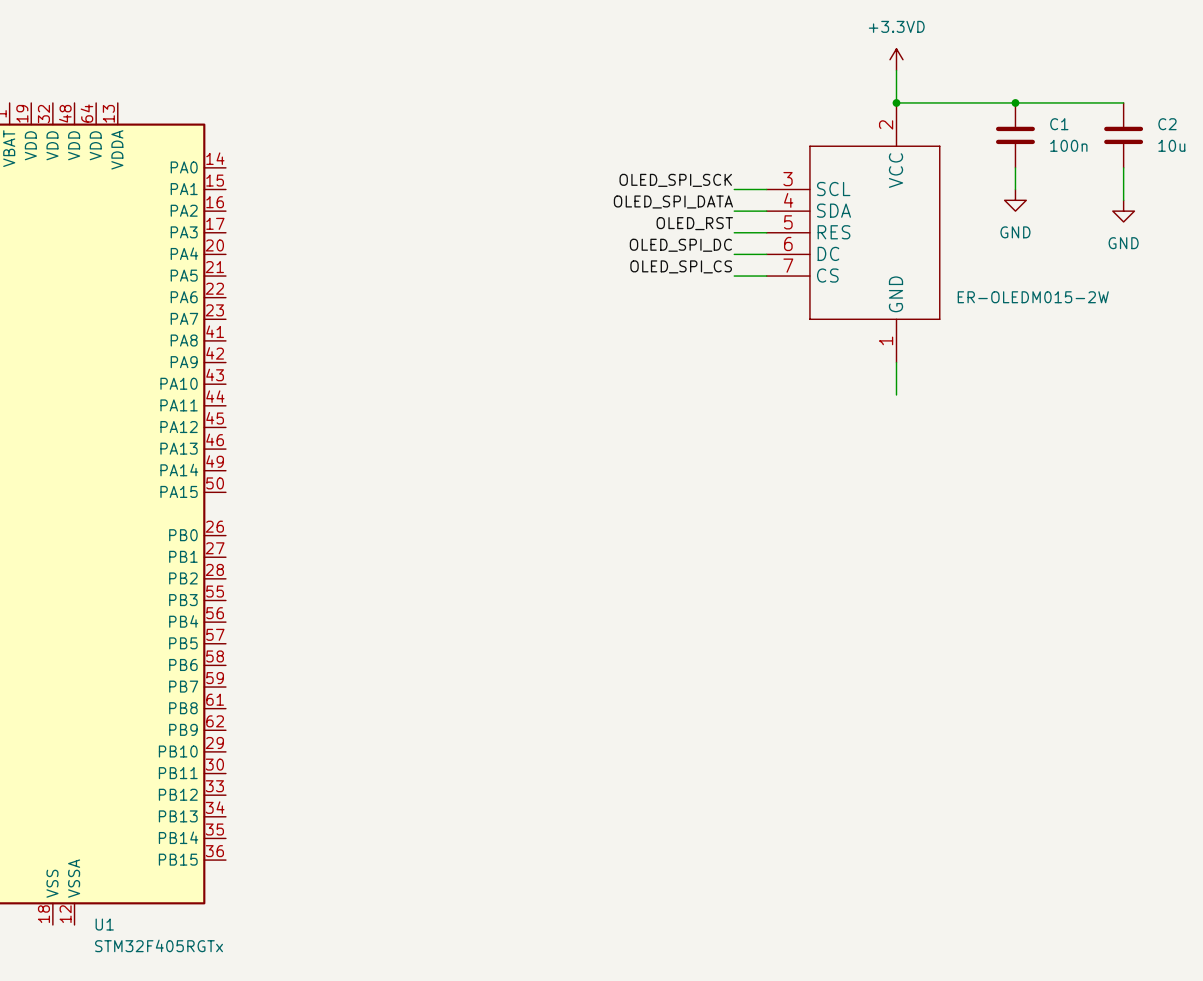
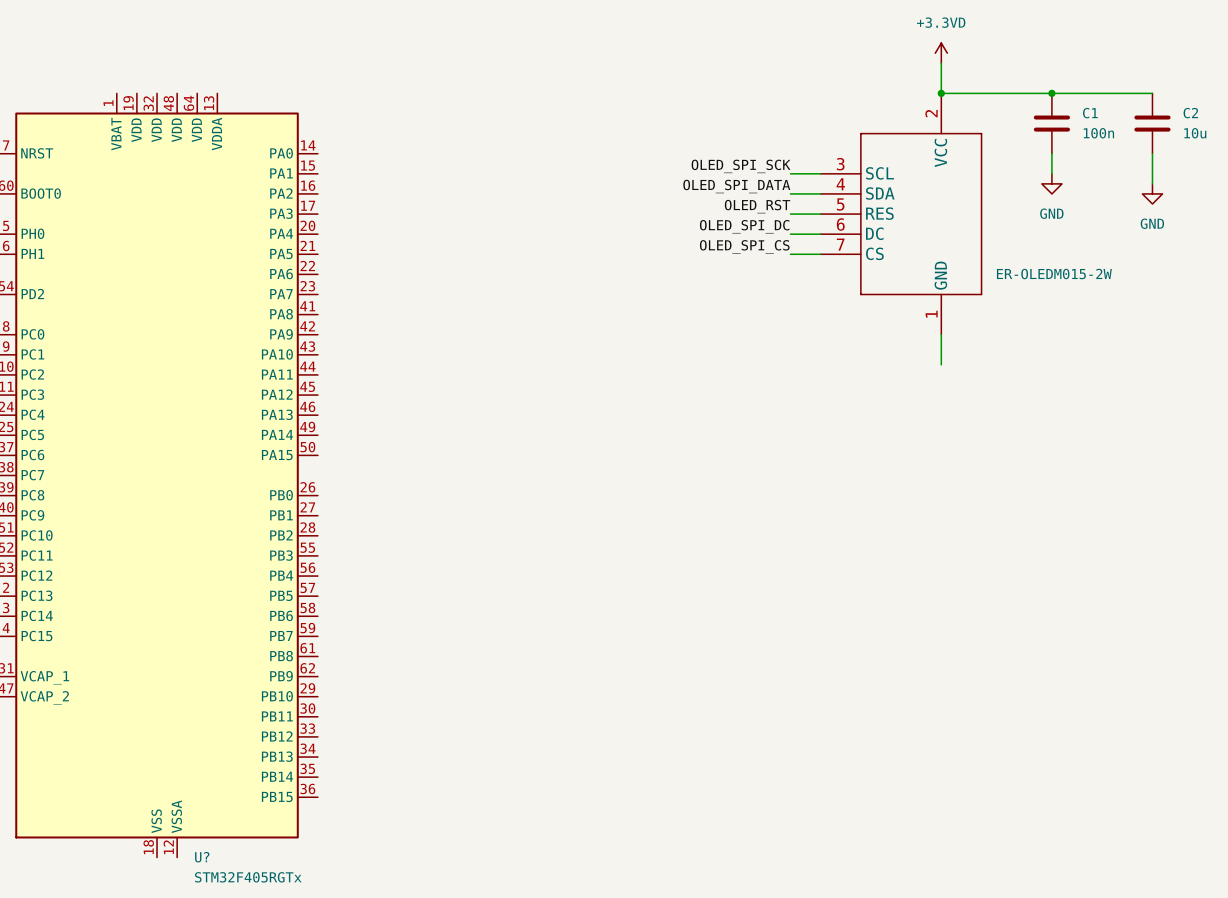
U1 name: U1 (104, 924) -> U? (202, 857)

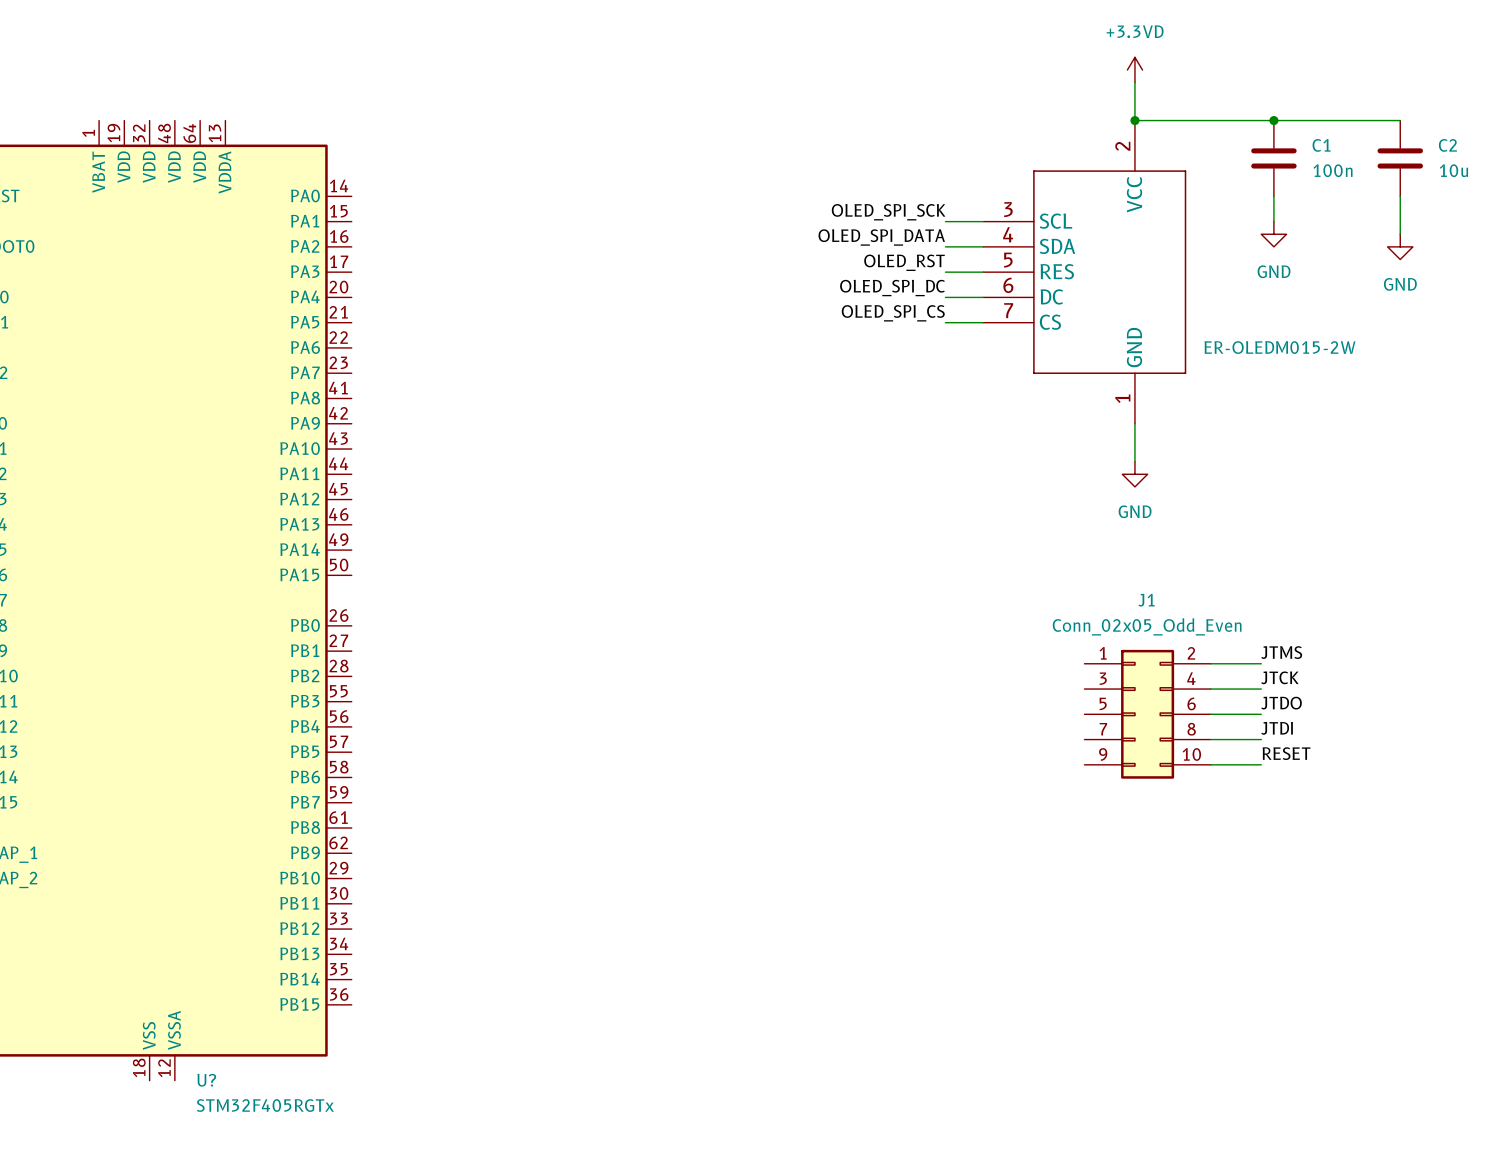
power symbol: none -> GND (1134, 474)
label: none -> JTMS (1281, 652)
wire: none -> (1210, 663) (1261, 663)
label: none -> JTCK (1279, 677)
wire: none -> (1210, 689) (1261, 689)
label: none -> JTDO (1281, 703)
J1: none -> Conn_02x05_Odd_Even (1147, 714)
wire: none -> (1210, 714) (1261, 714)
label: none -> JTDI (1277, 728)
wire: none -> (1210, 739) (1261, 739)
label: none -> RESET (1286, 753)
wire: none -> (1210, 764) (1261, 764)

